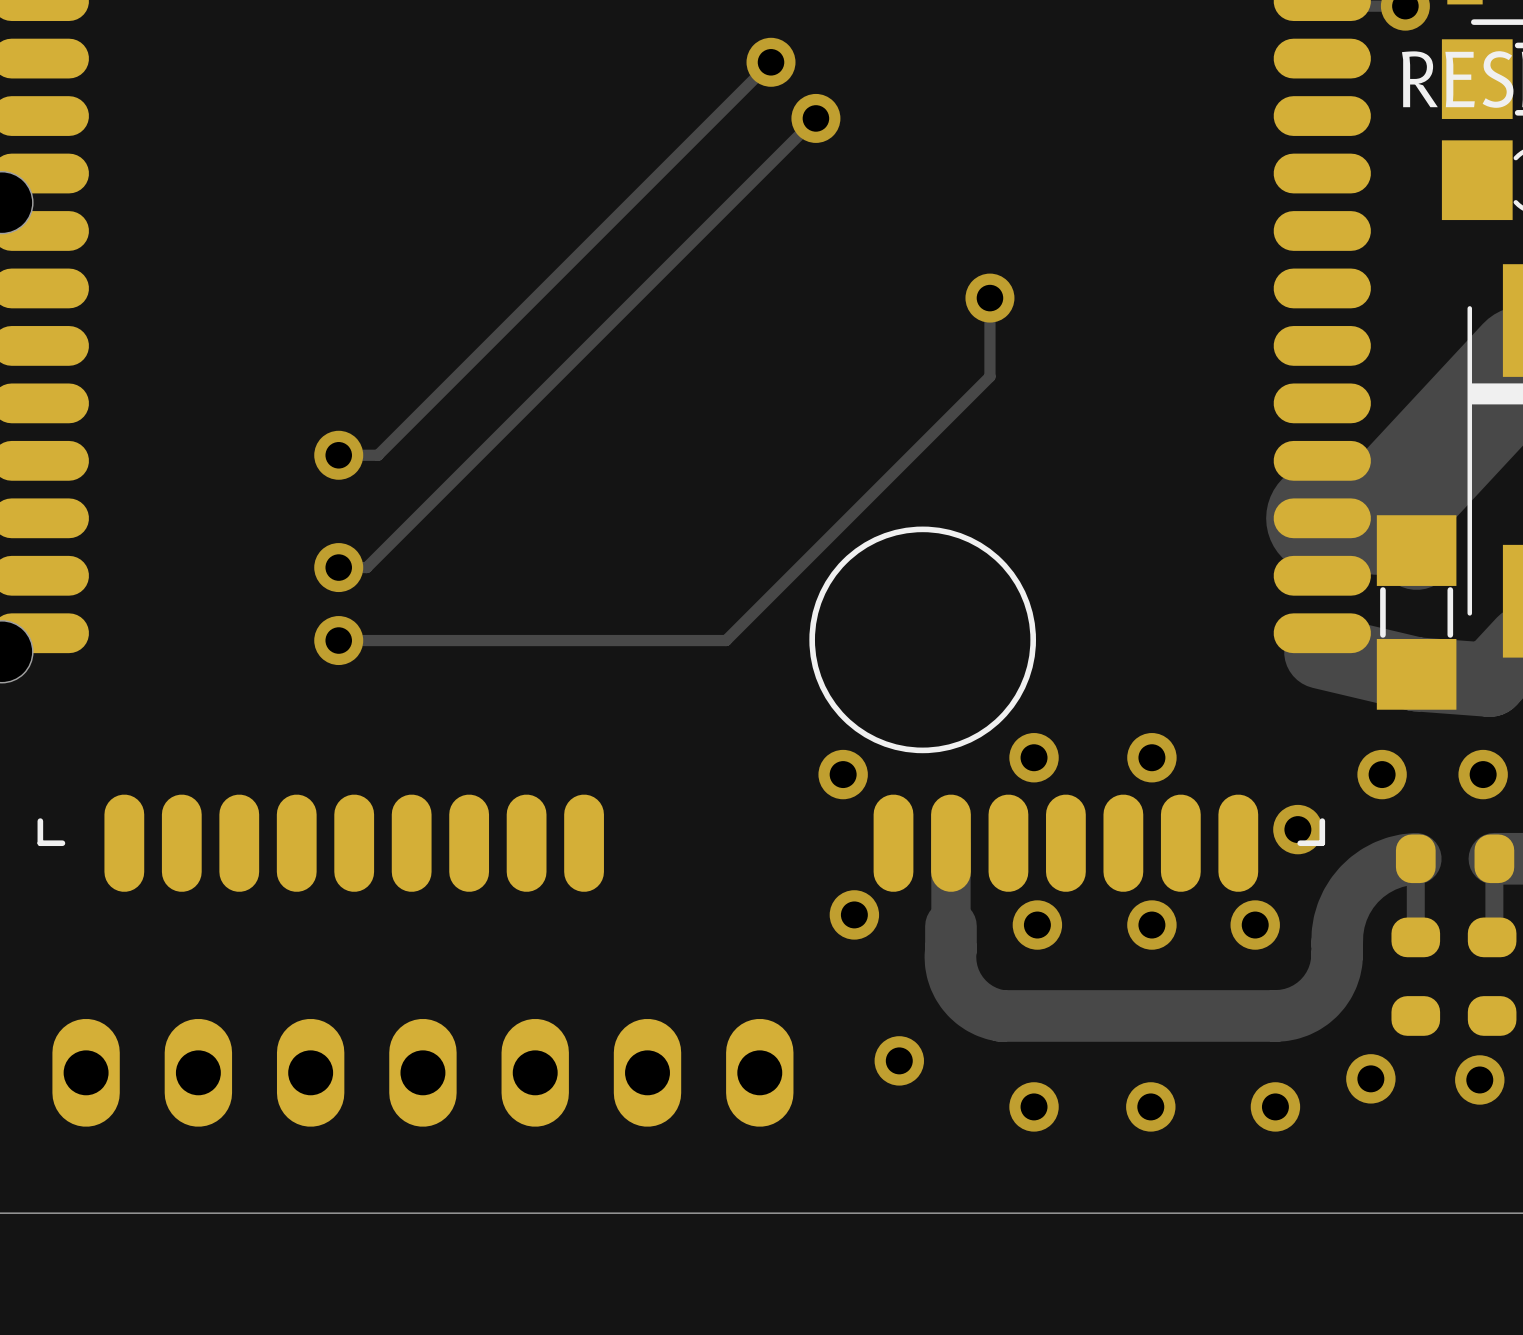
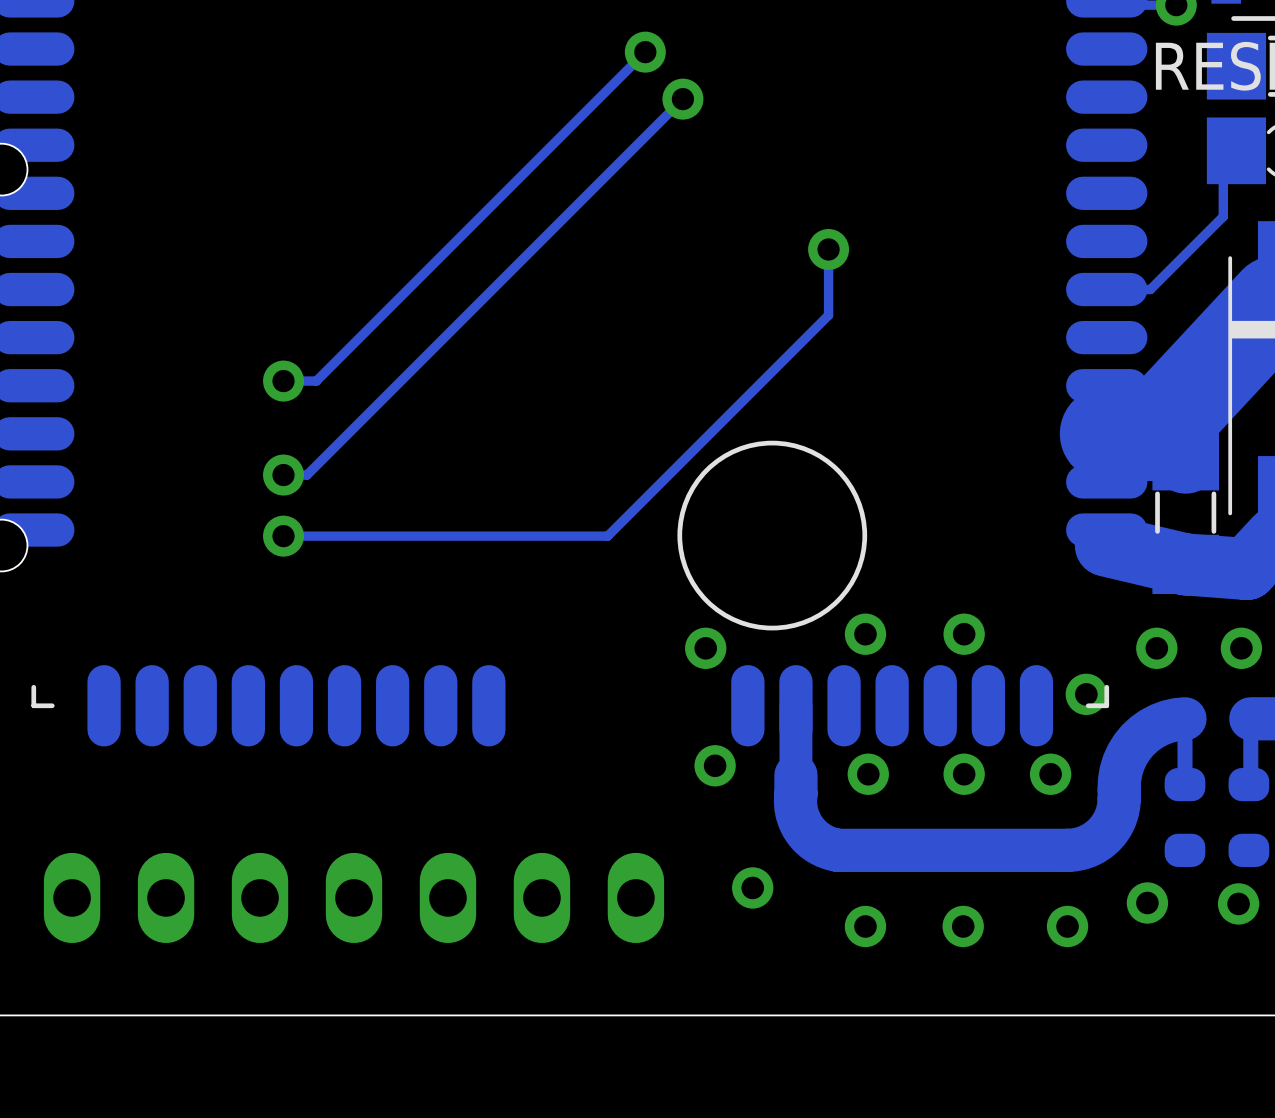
track: none -> (1236, 150) (1223, 163) (1223, 216) (1150, 289) (1106, 289)

